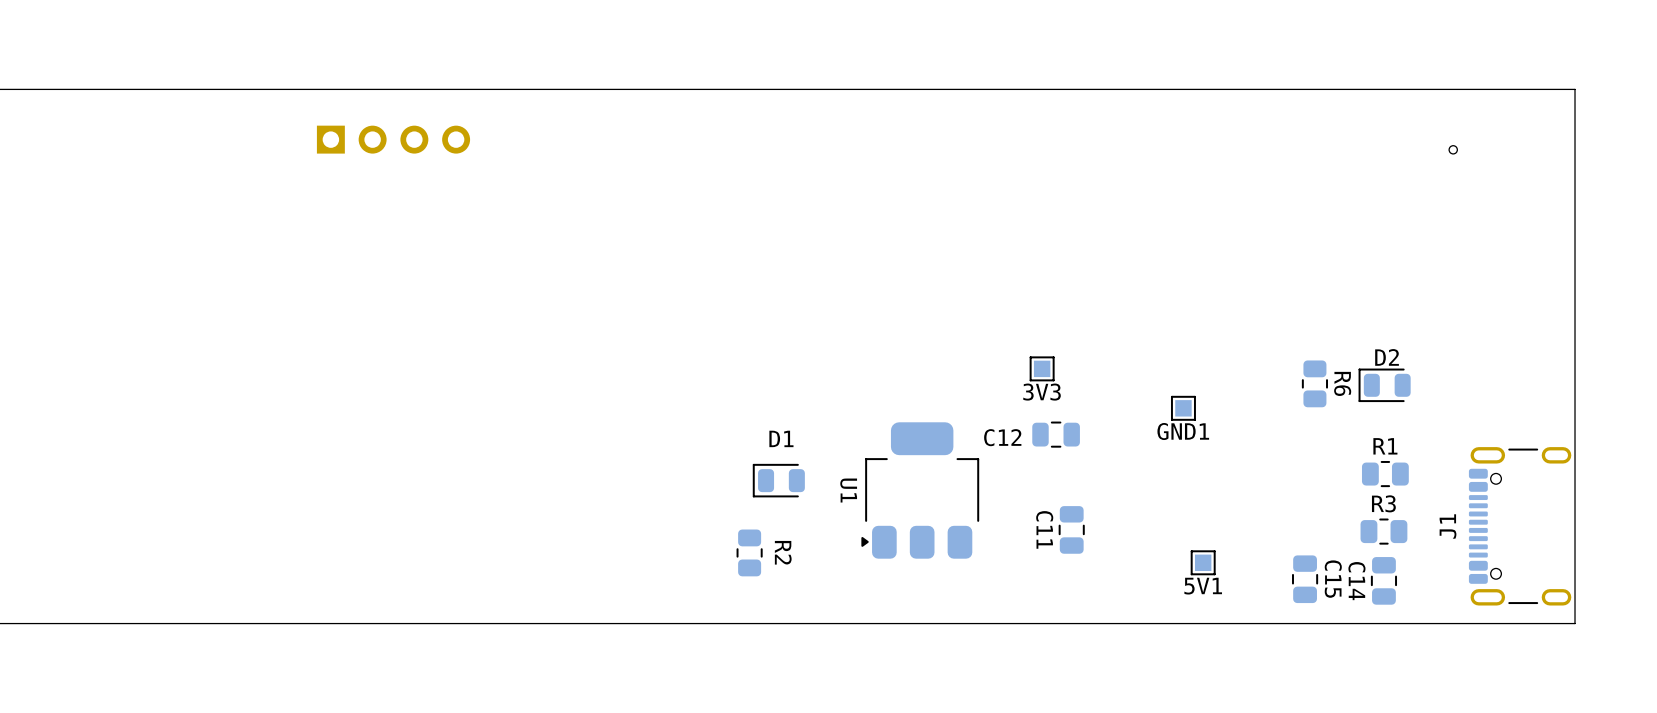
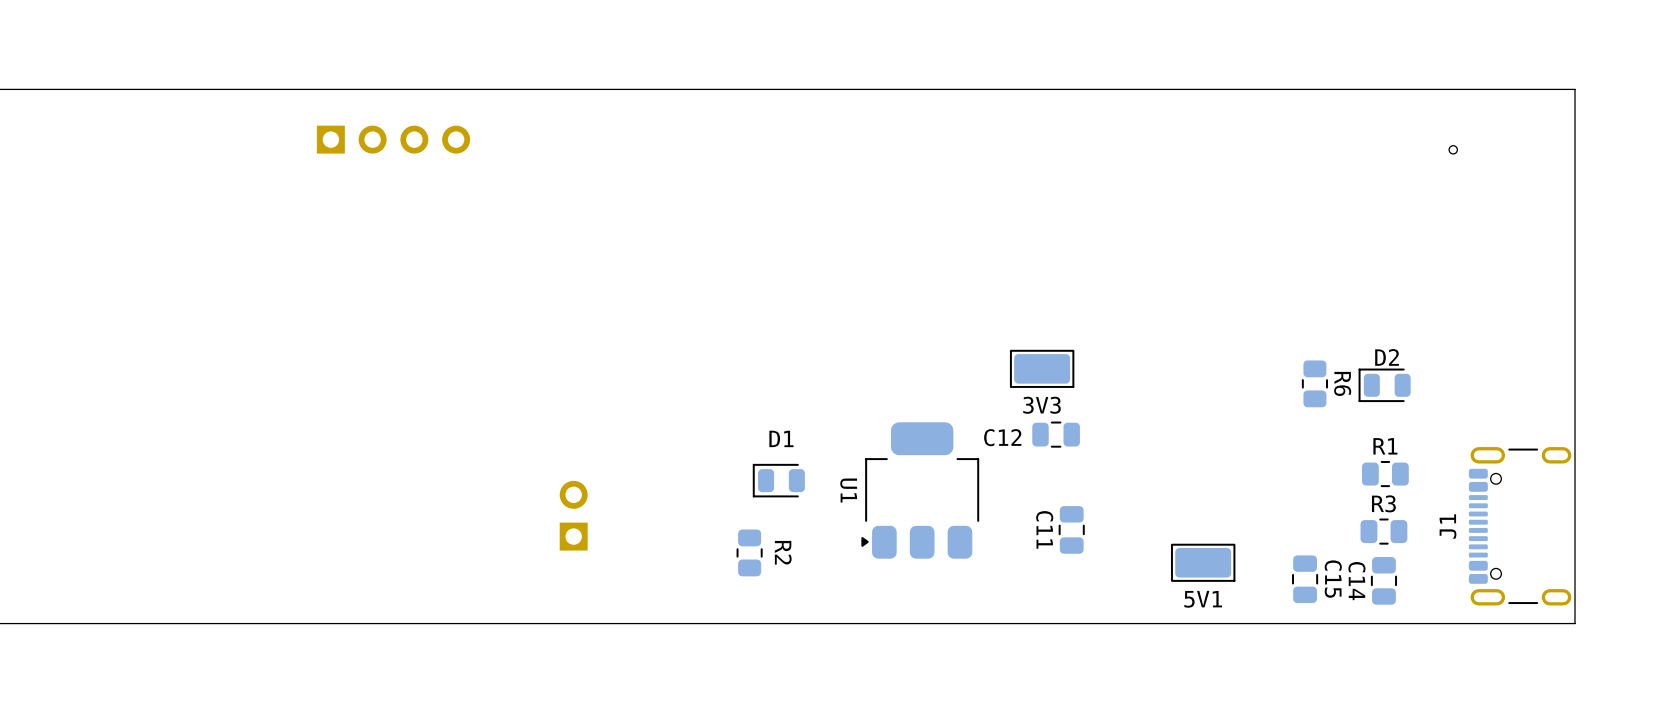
3V3 footprint: [1029, 356, 1055, 382] -> [1009, 349, 1075, 388]
GND1: (1183, 408) -> none
part: none -> (573, 515)
5V1 footprint: [1190, 550, 1216, 576] -> [1170, 543, 1236, 582]

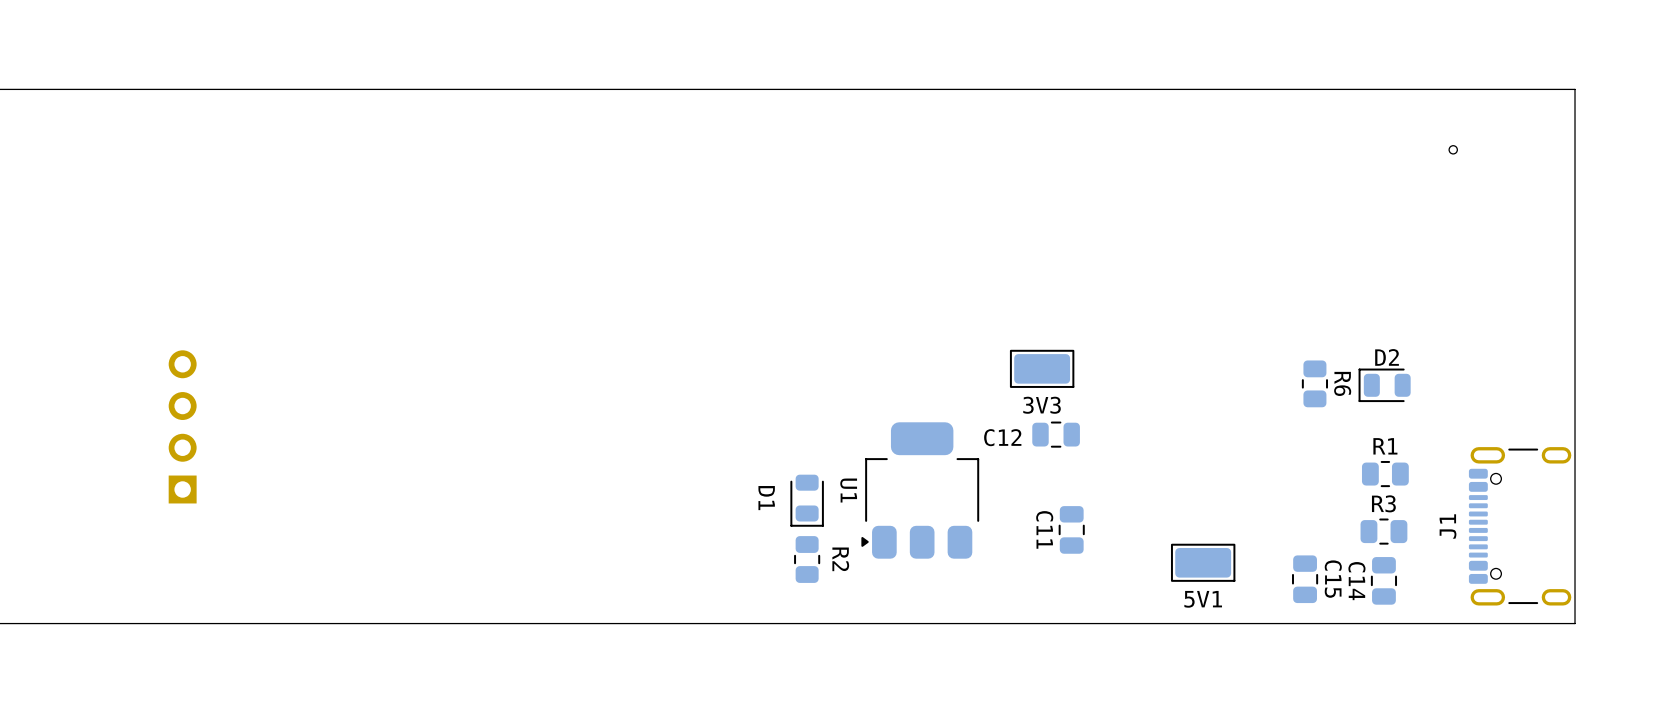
part rotation: 0° (393, 139) -> 90° counterclockwise (182, 426)
part position: (393, 139) -> (182, 426)
D1 rotation: 0° (778, 480) -> 90° counterclockwise (807, 500)
D1 position: (778, 480) -> (807, 500)
part: (573, 515) -> none
R2 position: (749, 552) -> (807, 559)

